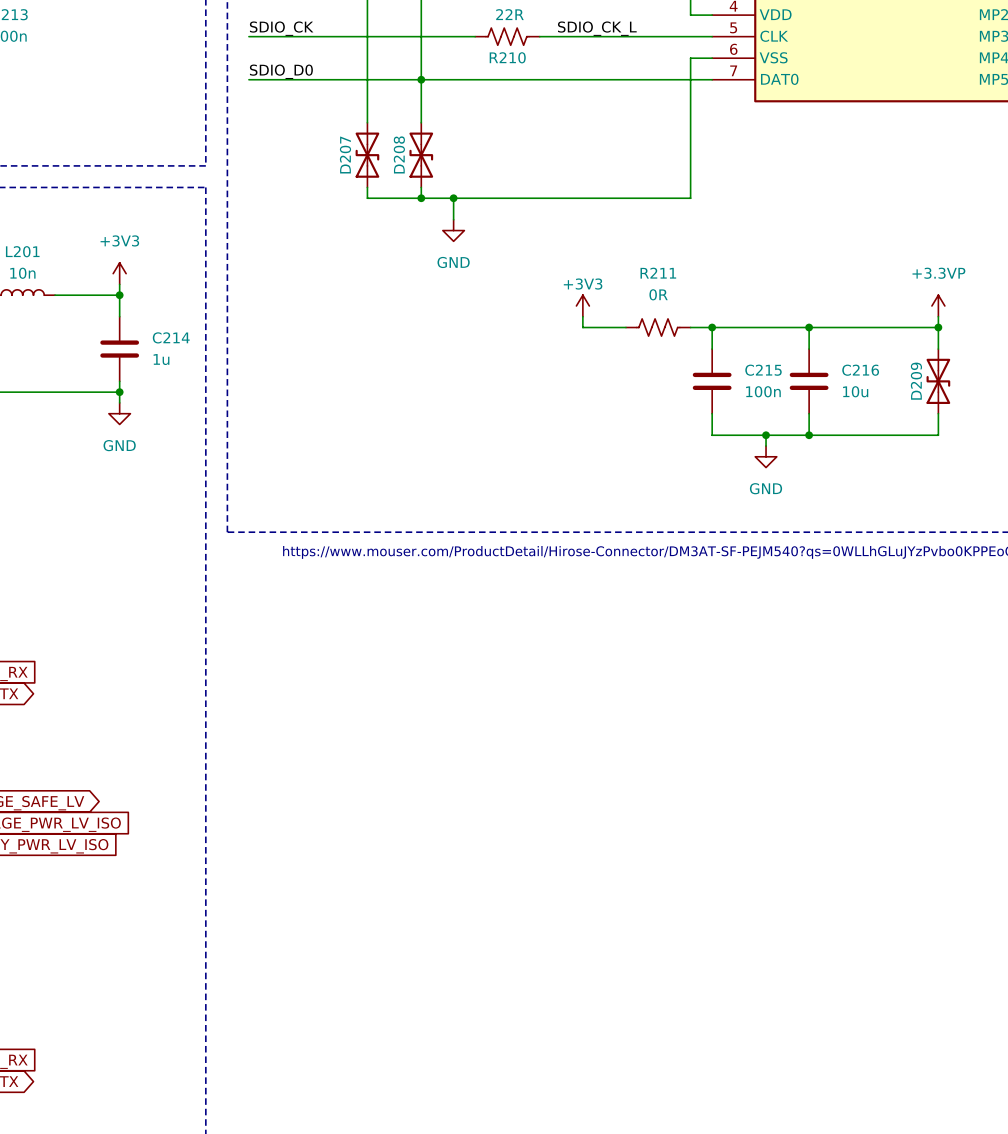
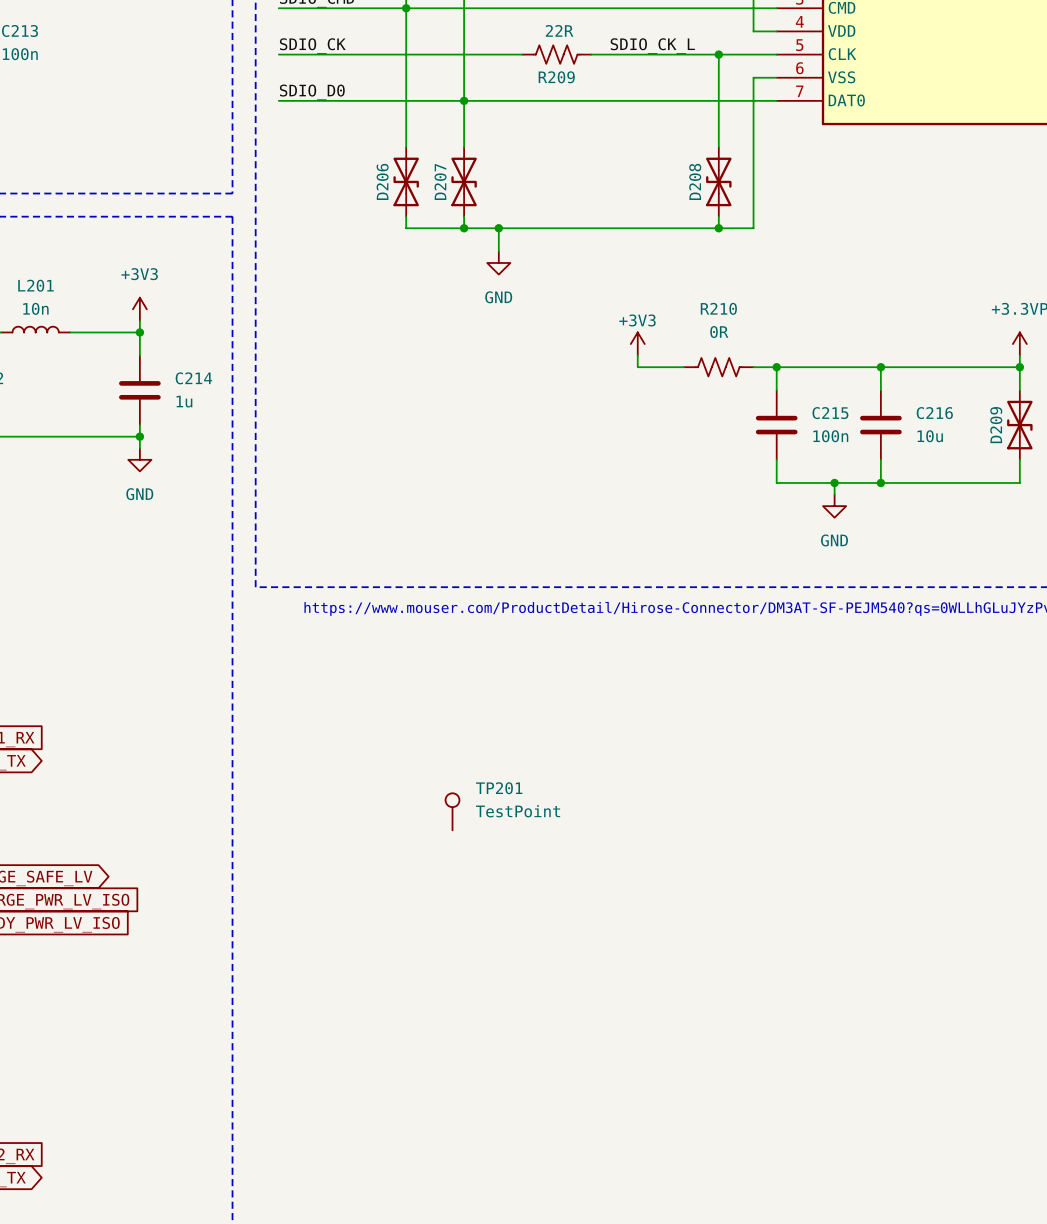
wire: none -> (718, 54) (718, 147)
junction: none -> (718, 54)
R210 name: R210 (507, 57) -> R209 (556, 77)
D208 name: D208 (399, 154) -> D207 (440, 182)
D207 name: D207 (345, 155) -> D206 (382, 181)
D208: none -> (718, 181)
wire: none -> (718, 216) (718, 228)
junction: none -> (718, 228)
R211 name: R211 (658, 273) -> R210 (718, 308)
TP201: none -> TestPoint (452, 811)

